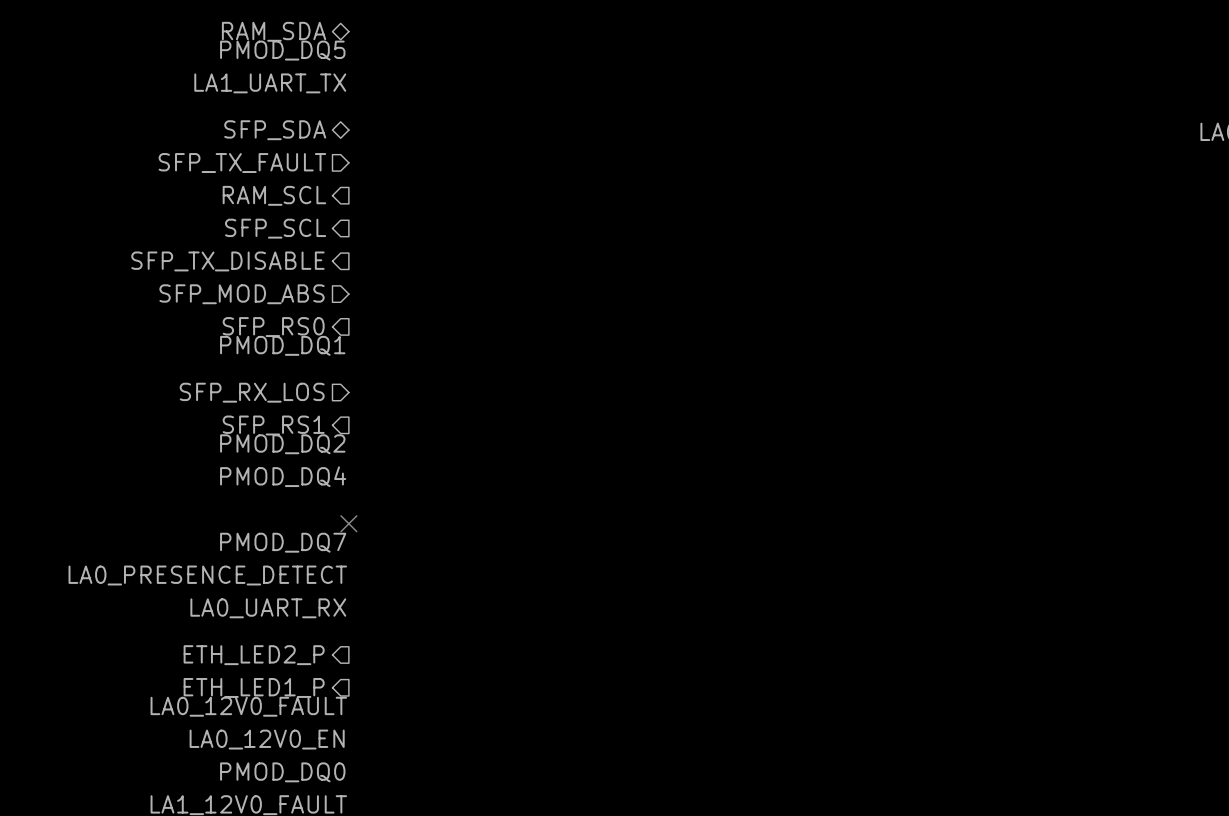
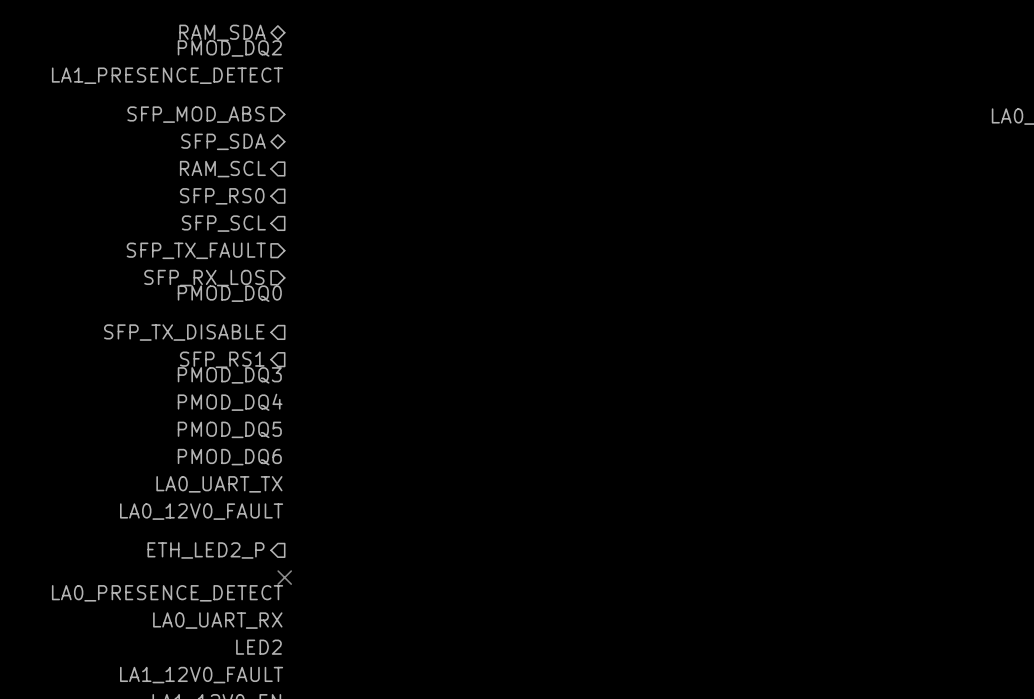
label: PMOD_DQ5 (282, 50) -> PMOD_DQ2 (229, 48)
label: LA1_UART_TX (270, 83) -> LA1_PRESENCE_DETECT (167, 75)
hierarchical label shape: bidirectional (275, 130) -> input (195, 114)
hierarchical label: SFP_SDA (275, 130) -> SFP_MOD_ABS (195, 114)
hierarchical label shape: input (242, 163) -> bidirectional (223, 141)
hierarchical label: SFP_TX_FAULT (242, 163) -> SFP_SDA (223, 141)
hierarchical label: SFP_SCL (275, 228) -> SFP_RS0 (222, 196)
hierarchical label: SFP_TX_DISABLE (227, 261) -> SFP_SCL (223, 223)
hierarchical label: SFP_MOD_ABS (242, 294) -> SFP_TX_FAULT (196, 250)
hierarchical label shape: output (273, 327) -> input (204, 278)
hierarchical label: SFP_RS0 (273, 327) -> SFP_RX_LOS (204, 278)
label: PMOD_DQ1 (282, 345) -> PMOD_DQ0 (229, 293)
hierarchical label shape: input (252, 392) -> output (184, 332)
hierarchical label: SFP_RX_LOS (252, 392) -> SFP_TX_DISABLE (184, 332)
label: PMOD_DQ2 (282, 444) -> PMOD_DQ3 (229, 375)
label: none -> PMOD_DQ5 (229, 429)
no-connect mark: (348, 523) -> none
label: PMOD_DQ7 (283, 542) -> PMOD_DQ6 (229, 457)
label: LA0_PRESENCE_DETECT (207, 575) -> LA0_UART_TX (219, 484)
label: LA0_UART_RX (268, 608) -> LA0_12V0_FAULT (201, 511)
hierarchical label: ETH_LED1_P (254, 687) -> none
no-connect mark: none -> (284, 577)
label: LA0_12V0_FAULT (248, 706) -> LA0_PRESENCE_DETECT (167, 593)
label: LA0_12V0_EN (267, 739) -> LA0_UART_RX (217, 620)
label: PMOD_DQ0 (282, 772) -> LED2 (258, 647)

